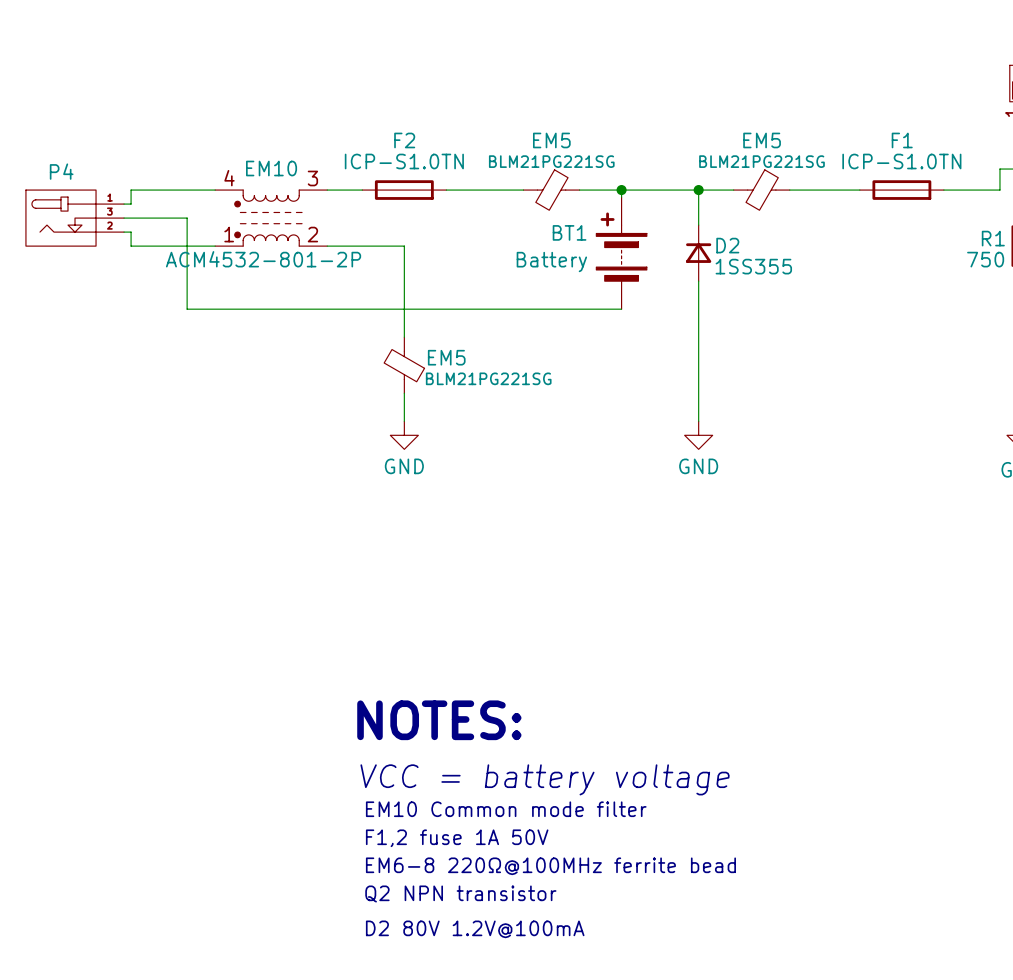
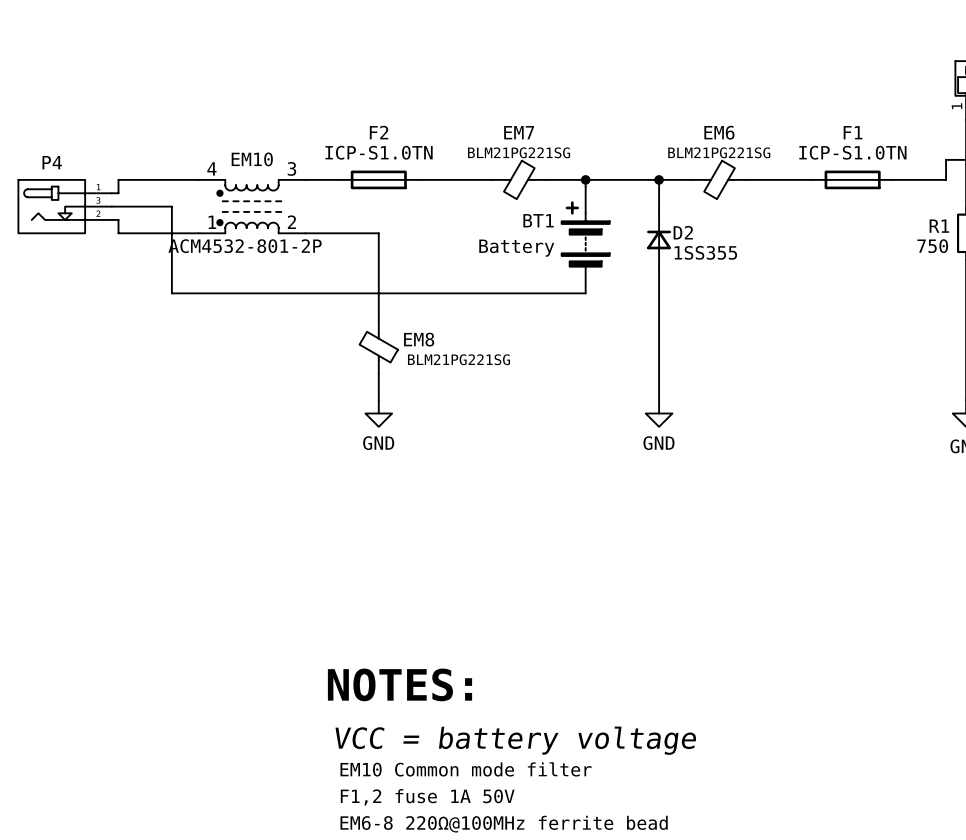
EM5 name: EM5 (551, 140) -> EM7 (519, 132)
EM5 name: EM5 (762, 140) -> EM6 (719, 132)
EM5 name: EM5 (446, 357) -> EM8 (419, 339)

